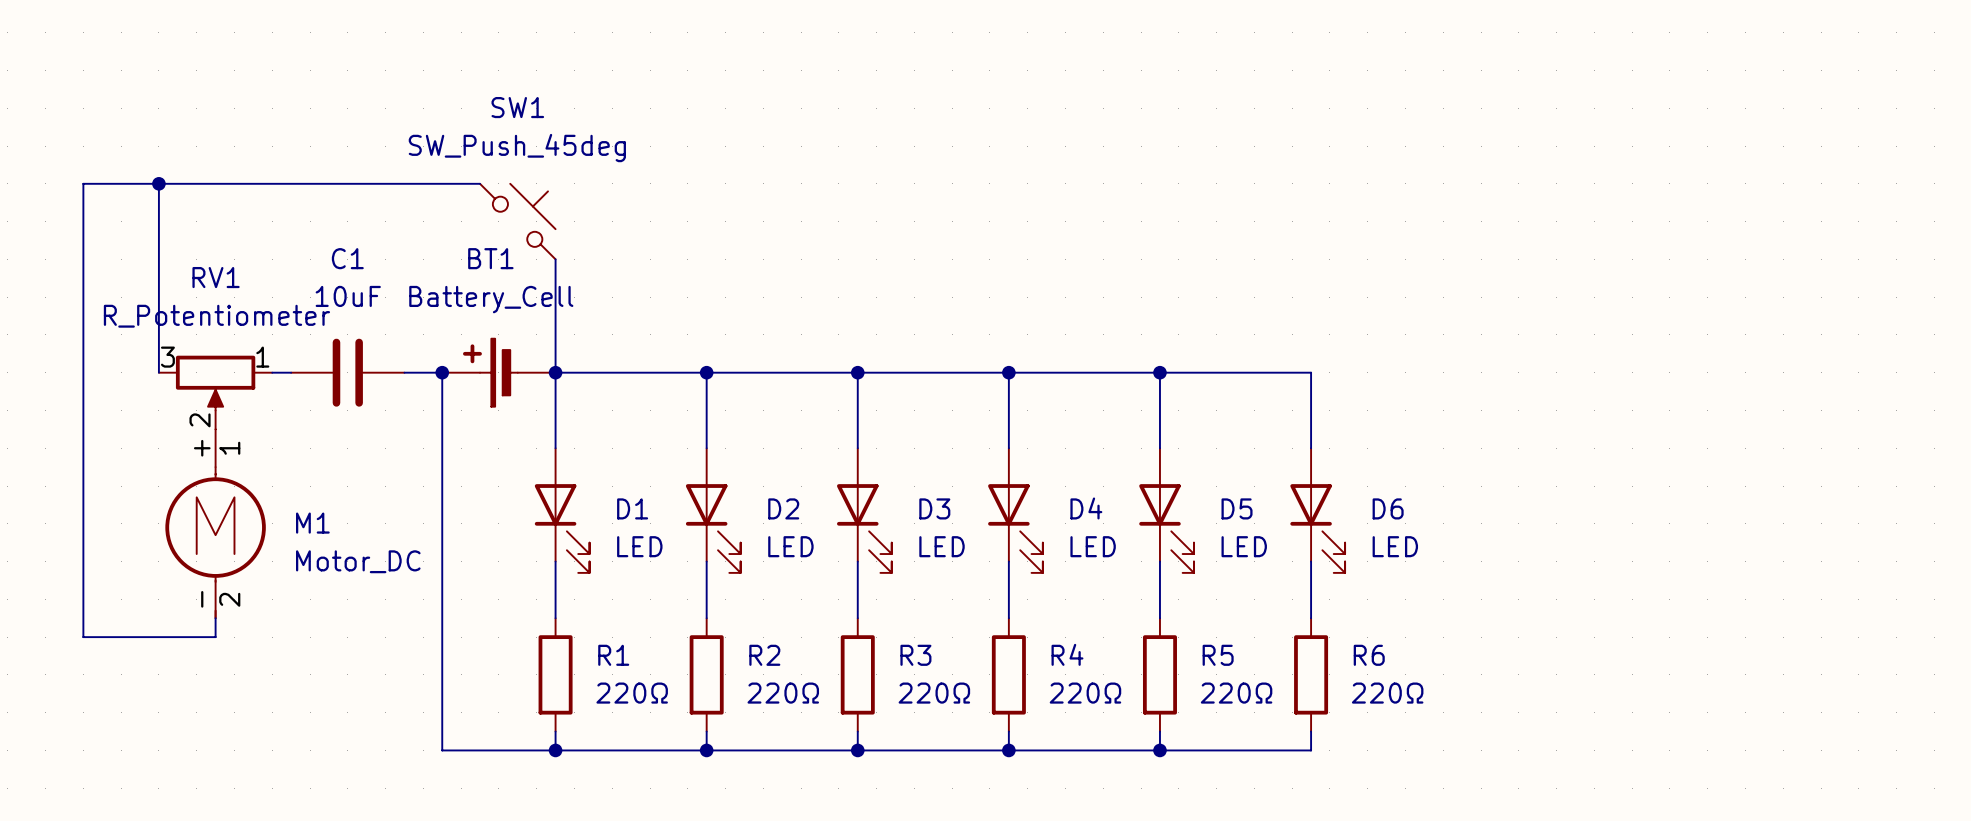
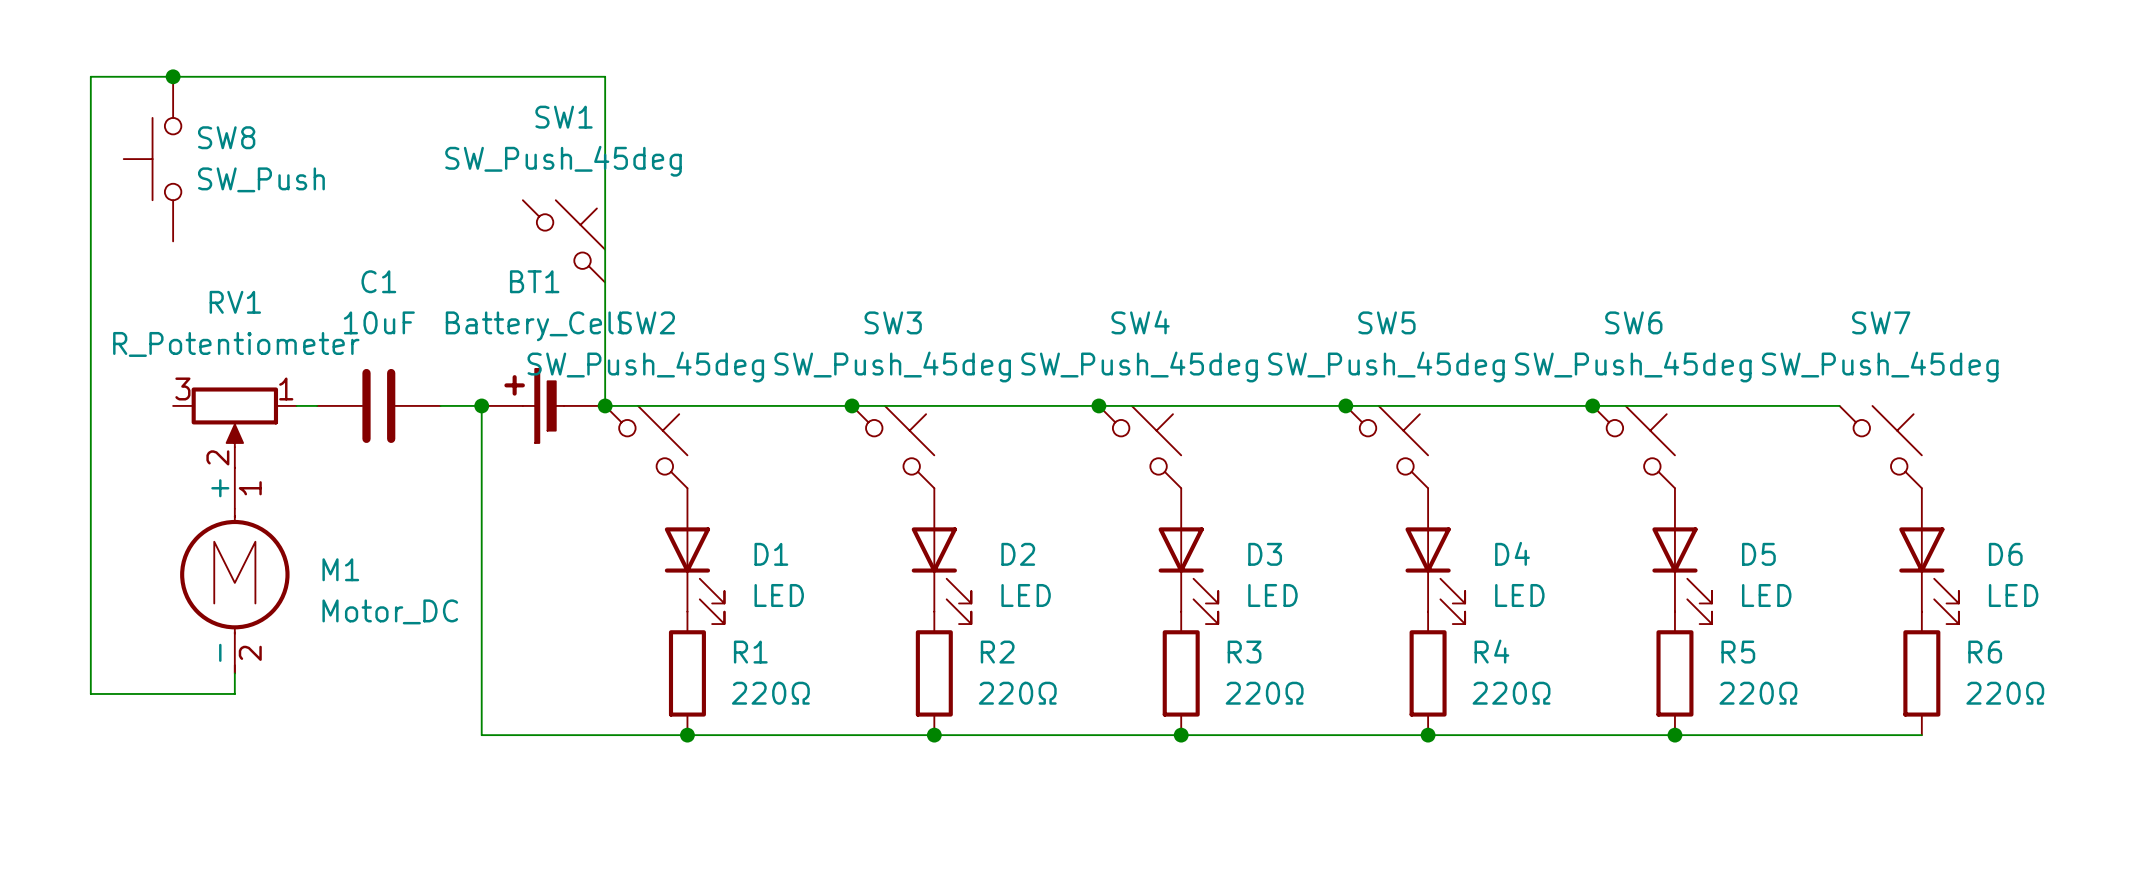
junction: none -> (173, 76)
SW8: none -> SW_Push (152, 159)
wire: (83, 183) (480, 183) -> (90, 200) (90, 76) (605, 76) (605, 282)
wire: (158, 183) (158, 372) -> none
junction: (158, 183) -> none
wire: (555, 372) (555, 448) -> none
wire: (706, 372) (706, 448) -> none
junction: (706, 372) -> none
junction: none -> (852, 405)
wire: (857, 372) (857, 448) -> none
junction: (857, 372) -> none
wire: (1008, 372) (1008, 448) -> none
wire: (1159, 372) (1159, 448) -> none
junction position: (1159, 372) -> (1345, 405)
wire: (1311, 372) (1311, 448) -> (1428, 405) (1839, 405)
junction: none -> (1592, 405)
SW2: none -> SW_Push_45deg (646, 447)
SW3: none -> SW_Push_45deg (893, 447)
SW4: none -> SW_Push_45deg (1140, 447)
SW5: none -> SW_Push_45deg (1386, 447)
SW6: none -> SW_Push_45deg (1633, 447)
SW7: none -> SW_Push_45deg (1880, 447)
D3 name: D3 (934, 508) -> D2 (1018, 554)
D6 name: D6 (1388, 508) -> D4 (1512, 553)
D1 position: (562, 510) -> (694, 556)
D2: LED (713, 510) -> none
D4: LED (1015, 510) -> none
D3: none -> LED (1188, 556)
D5 position: (1166, 510) -> (1682, 556)
D6: none -> LED (1929, 556)
wire: (555, 561) (555, 618) -> none
wire: (706, 561) (706, 618) -> none
wire: (857, 561) (857, 618) -> none
wire: (1008, 561) (1008, 618) -> none
wire: (1159, 561) (1159, 618) -> none
wire: (1311, 561) (1311, 618) -> none
wire: (442, 674) (442, 750) (1311, 750) (1311, 731) -> (481, 735) (1921, 735)
R1 position: (555, 674) -> (687, 673)
junction: none -> (687, 735)
R2 position: (706, 674) -> (934, 673)
R3 position: (857, 674) -> (1181, 673)
R4 position: (1008, 674) -> (1428, 673)
junction: none -> (1181, 735)
R5 position: (1159, 674) -> (1674, 673)
junction: none -> (1428, 735)
R6 position: (1311, 674) -> (1921, 673)
junction: none -> (1674, 735)
wire: (555, 731) (555, 750) -> none
wire: (706, 731) (706, 750) -> none
wire: (857, 731) (857, 750) -> none
wire: (1008, 731) (1008, 750) -> none
wire: (1159, 731) (1159, 750) -> none
junction: (555, 750) -> none
junction: (706, 750) -> none
junction position: (857, 750) -> (934, 735)
junction: (1008, 750) -> none
junction: (1159, 750) -> none

